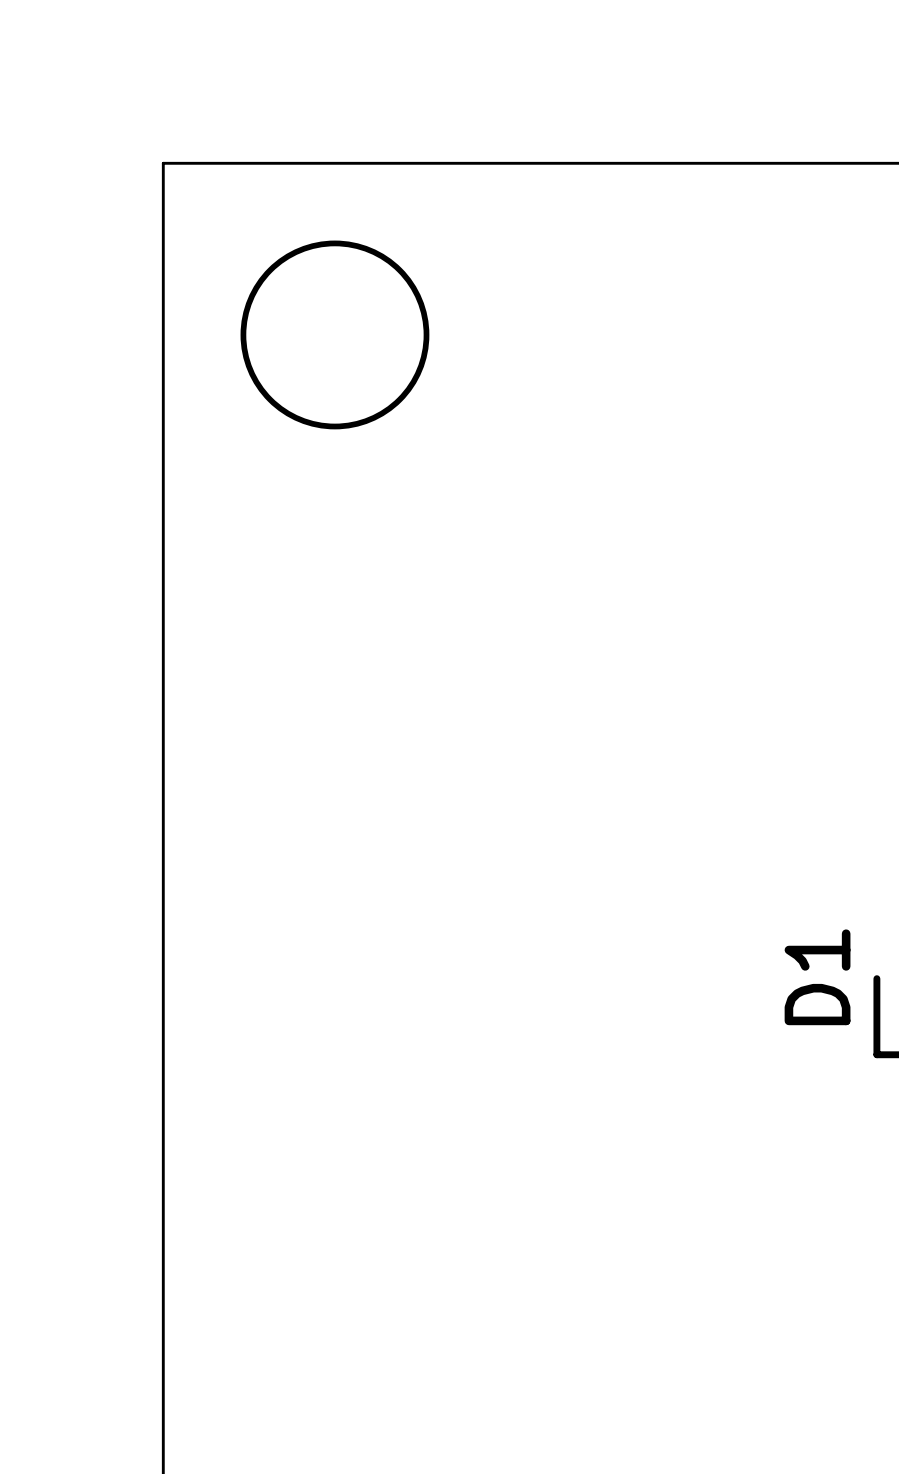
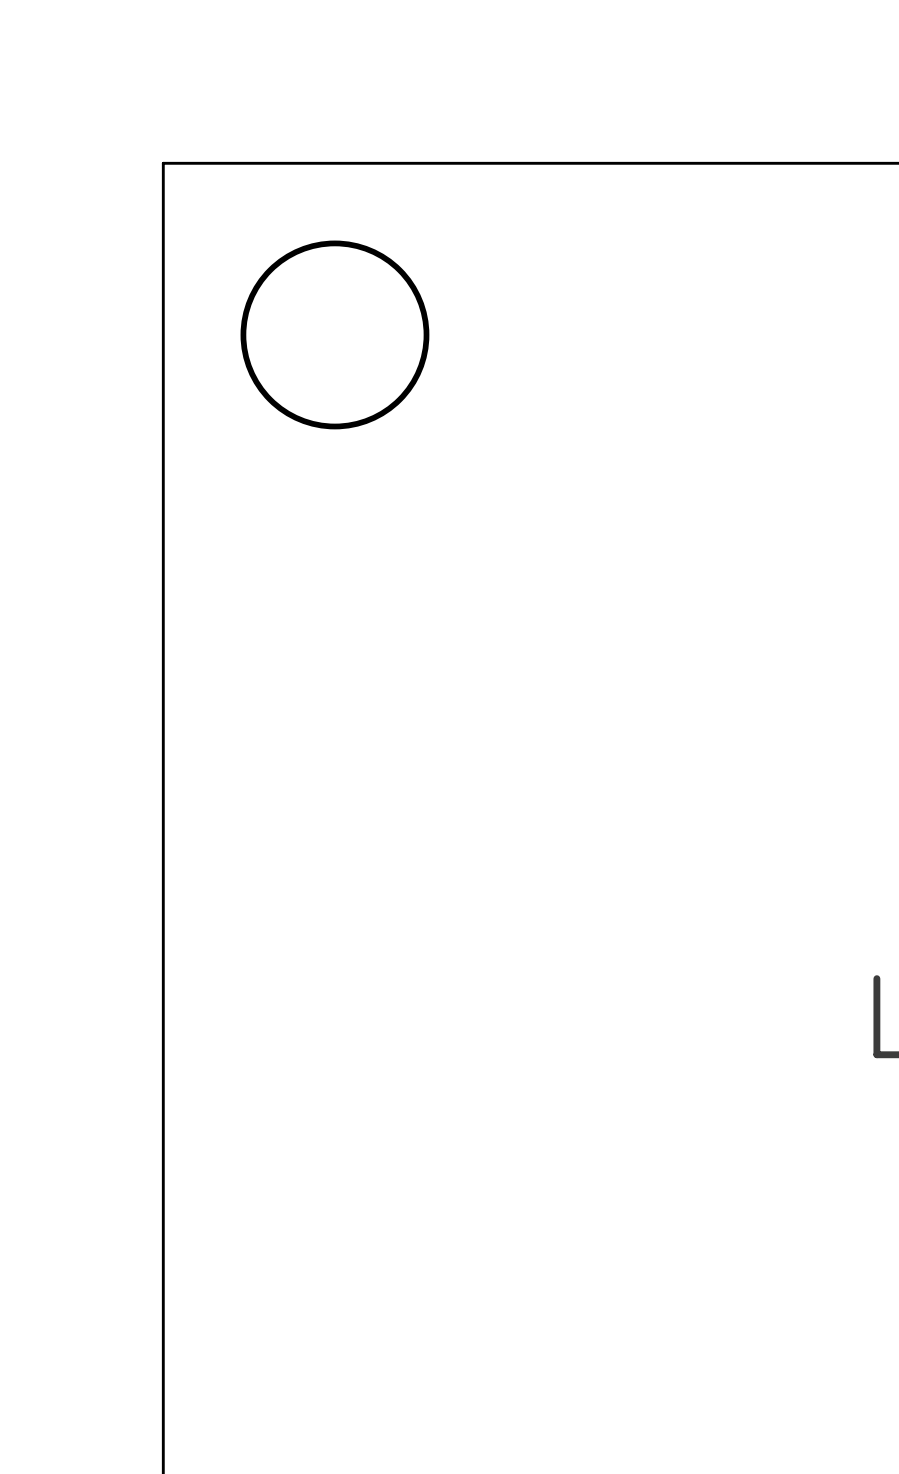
D1 name: D1 (817, 977) -> none

